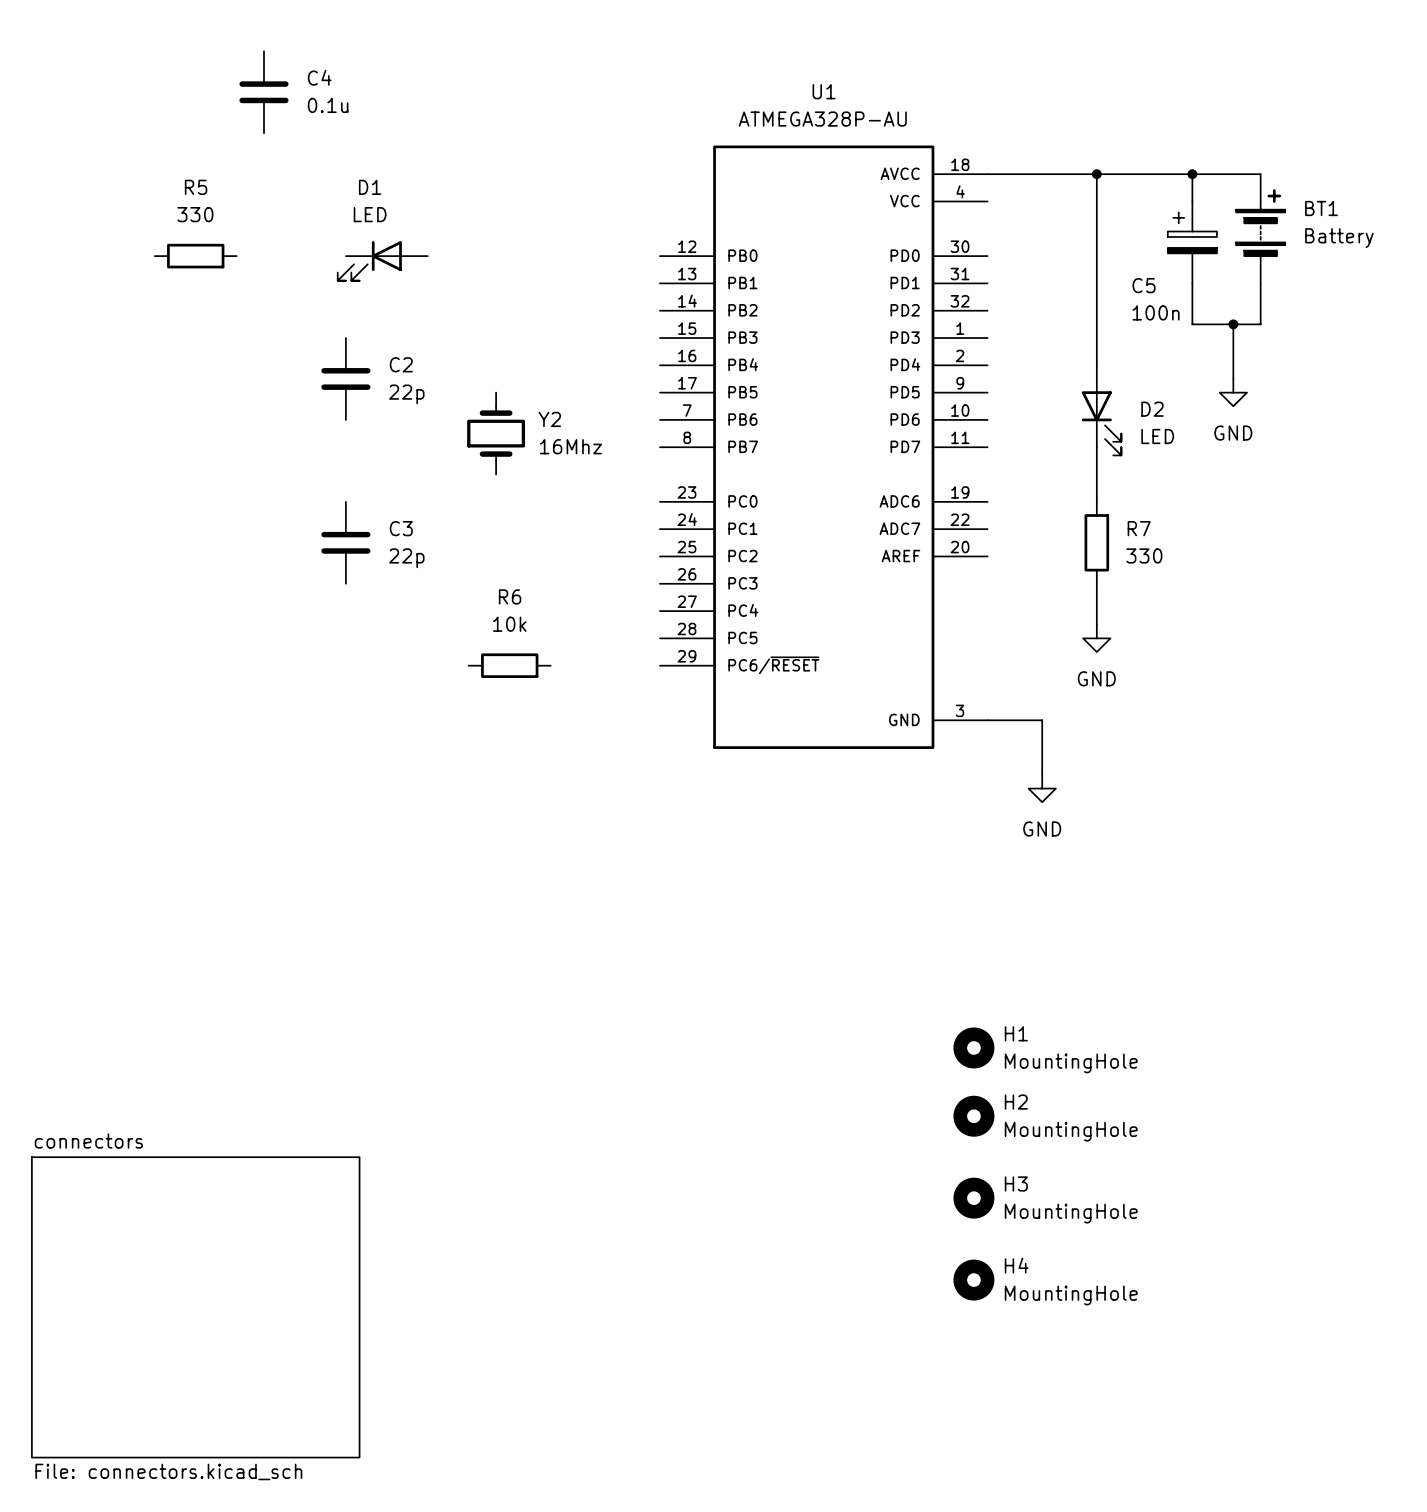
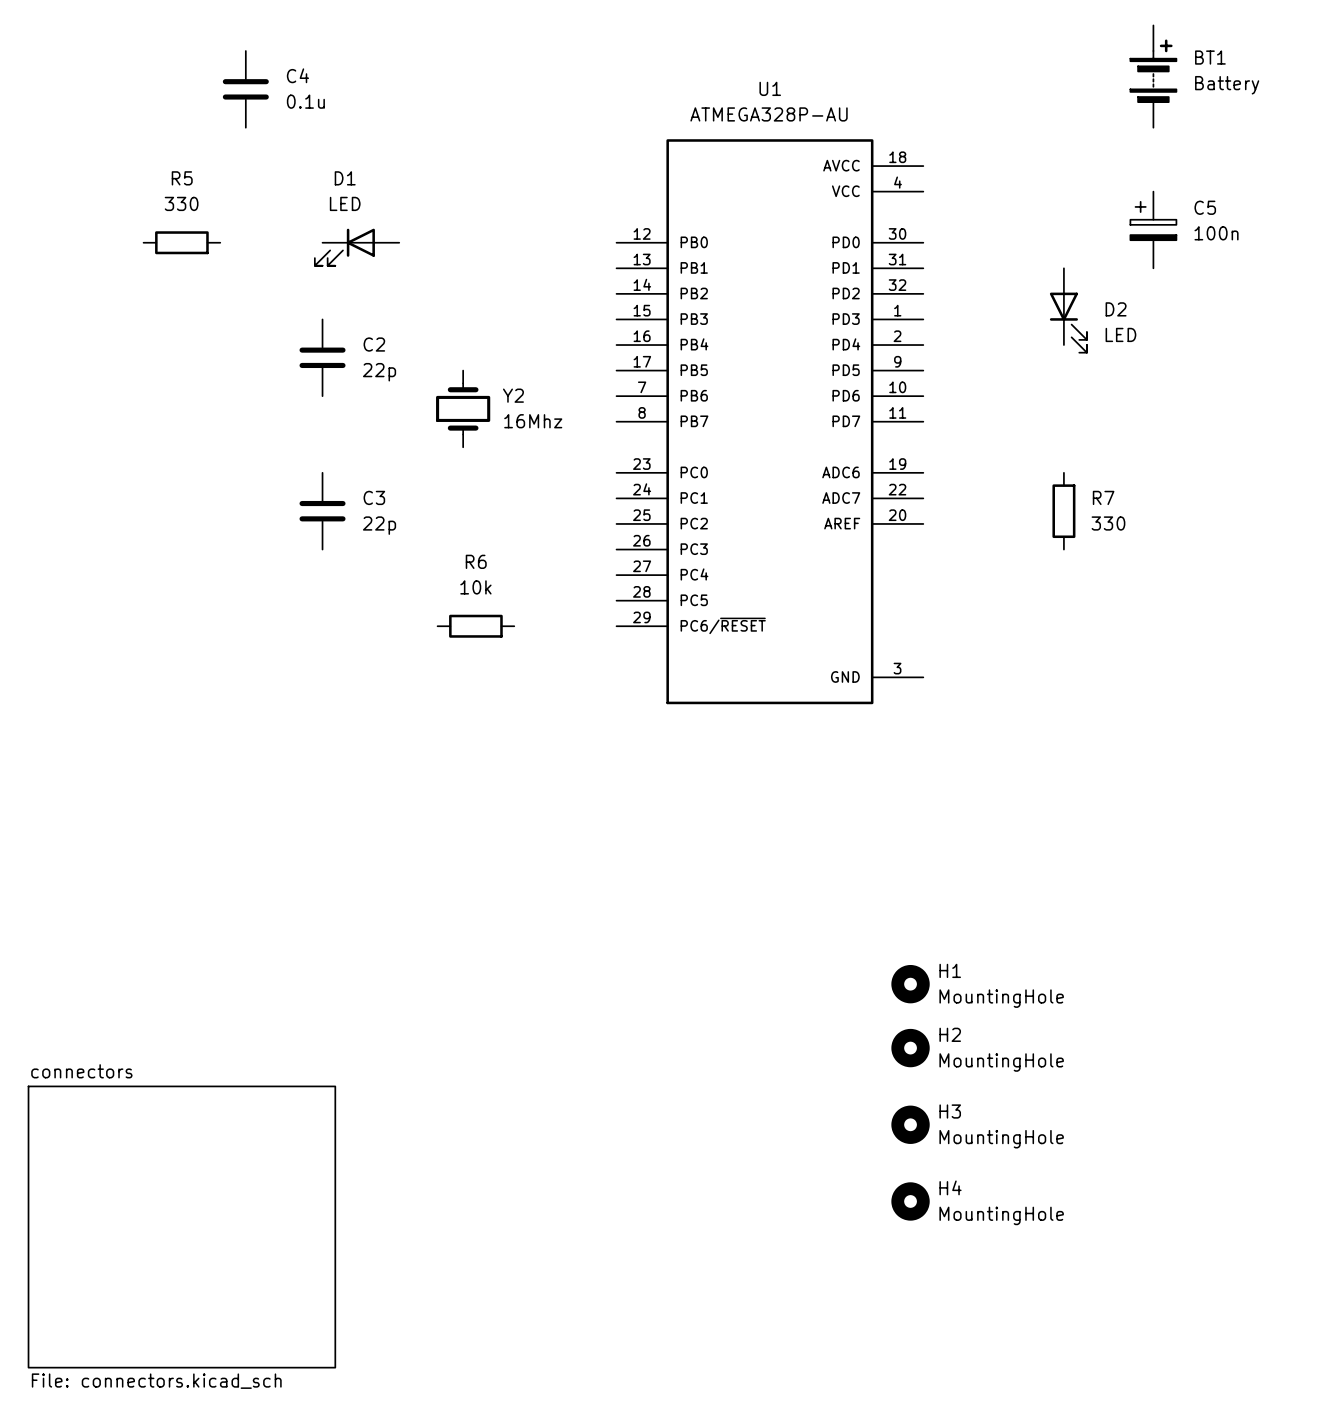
wire: (987, 174) (1260, 174) -> none
wire: (1096, 174) (1096, 365) -> none
junction: (1096, 174) -> none
wire: (1192, 174) (1192, 201) -> none
junction: (1192, 174) -> none
BT1 position: (1260, 228) -> (1153, 76)
C5 position: (1192, 242) -> (1153, 229)
wire: (1192, 283) (1192, 324) (1260, 324) (1260, 283) -> none
C5 name position: C5 (1143, 285) -> C5 (1205, 207)
C5 value position: 100n (1156, 312) -> 100n (1216, 233)
wire: (1233, 324) (1233, 378) -> none
junction: (1233, 324) -> none
power symbol: GND (1233, 392) -> none
D2 position: (1101, 410) -> (1068, 310)
wire: (1096, 447) (1096, 501) -> none
R7 position: (1096, 542) -> (1063, 511)
wire: (1096, 583) (1096, 624) -> none
power symbol: GND (1096, 638) -> none
wire: (987, 720) (1042, 720) (1042, 774) -> none
power symbol: GND (1042, 788) -> none

